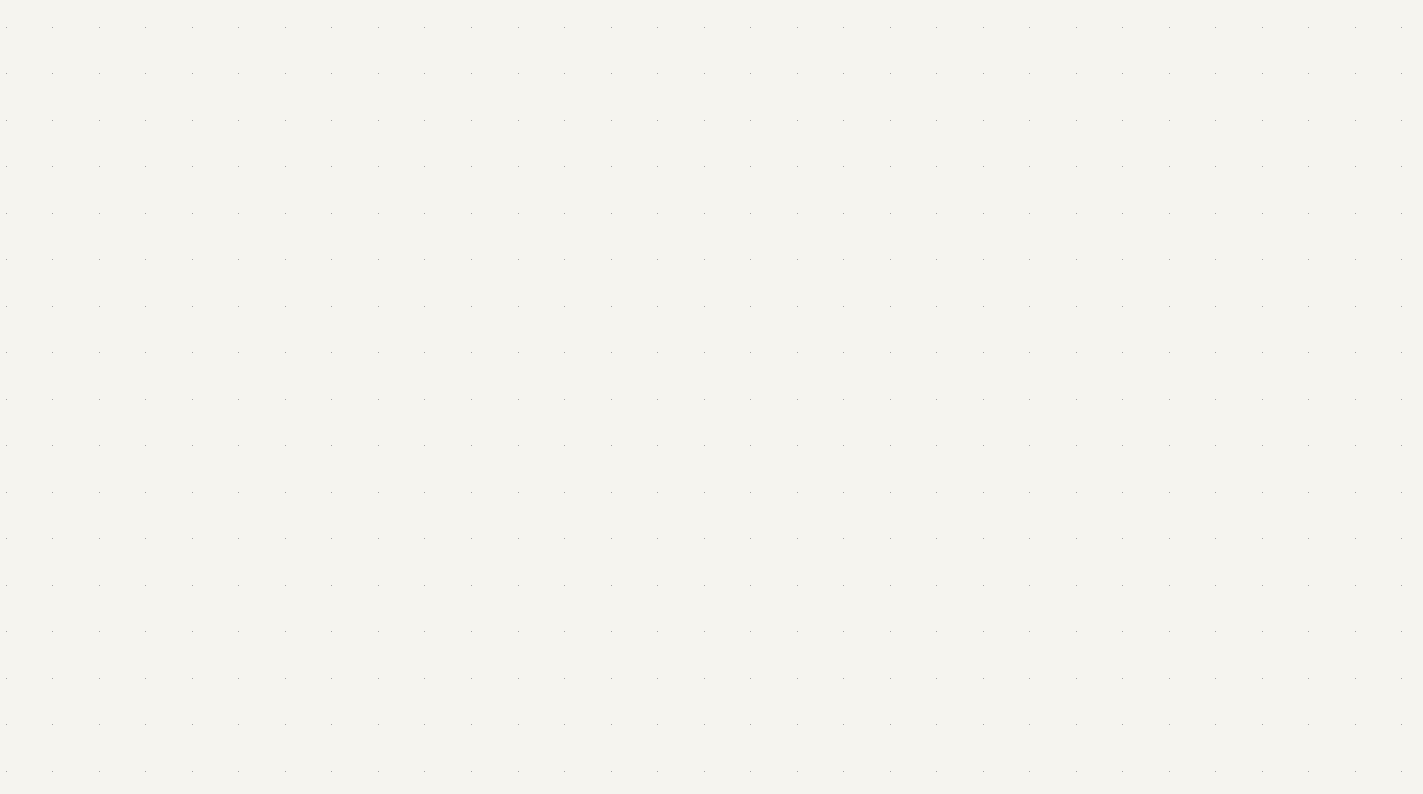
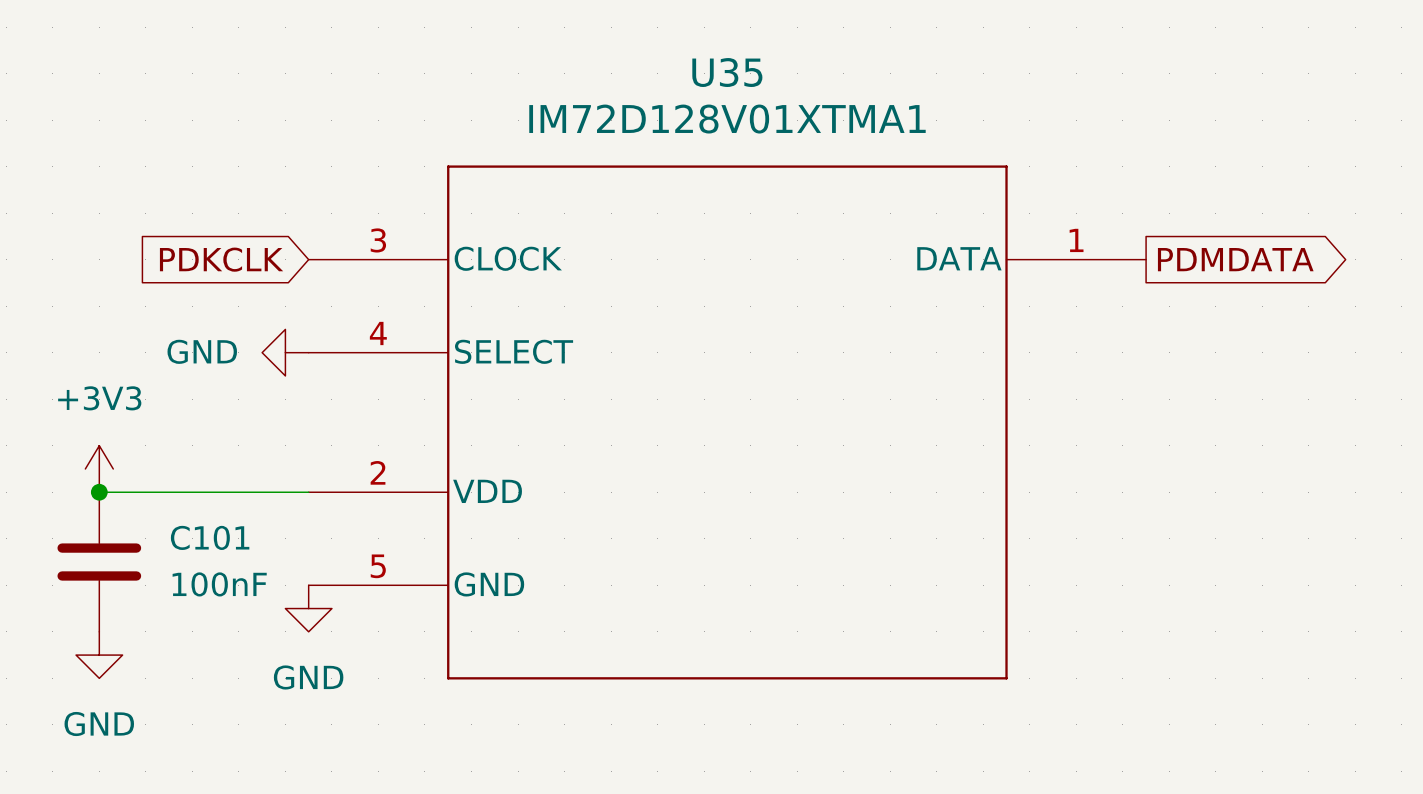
global label: none -> PDKCLK (221, 259)
global label: none -> PDMDATA (1235, 259)
power symbol: none -> GND (285, 352)
U35: none -> IM72D128V01XTMA1 (727, 422)
power symbol: none -> +3V3 (99, 468)
wire: none -> (99, 492) (308, 492)
junction: none -> (99, 492)
C101: none -> 100nF (99, 562)
power symbol: none -> GND (308, 608)
power symbol: none -> GND (99, 655)

